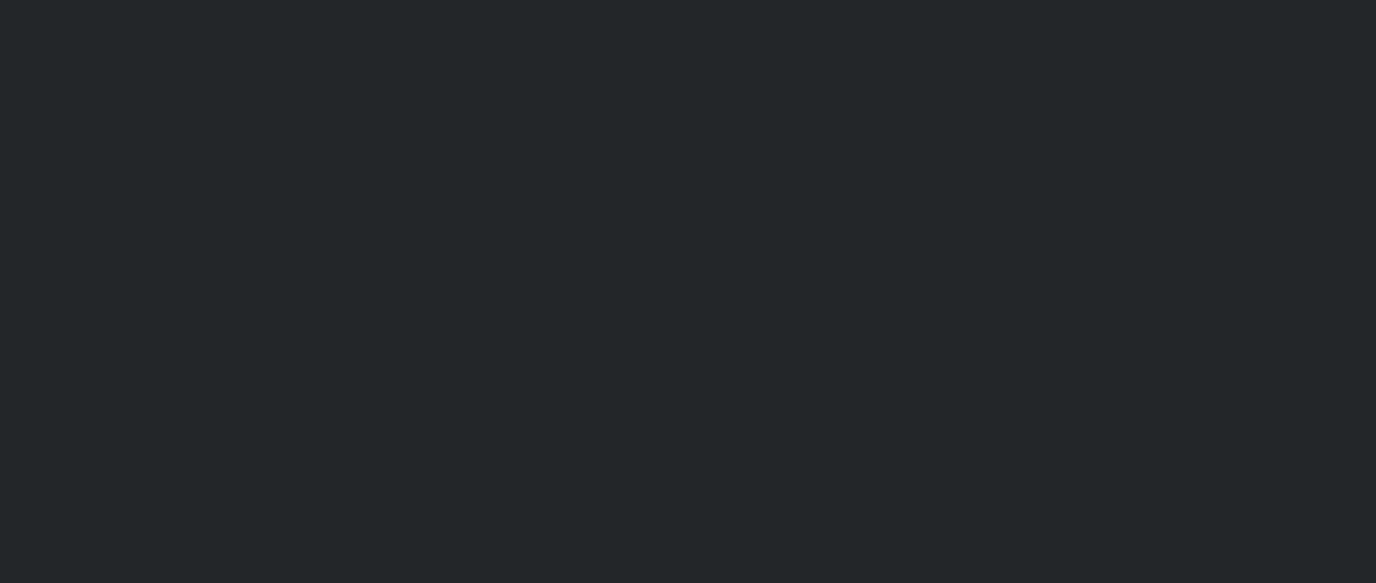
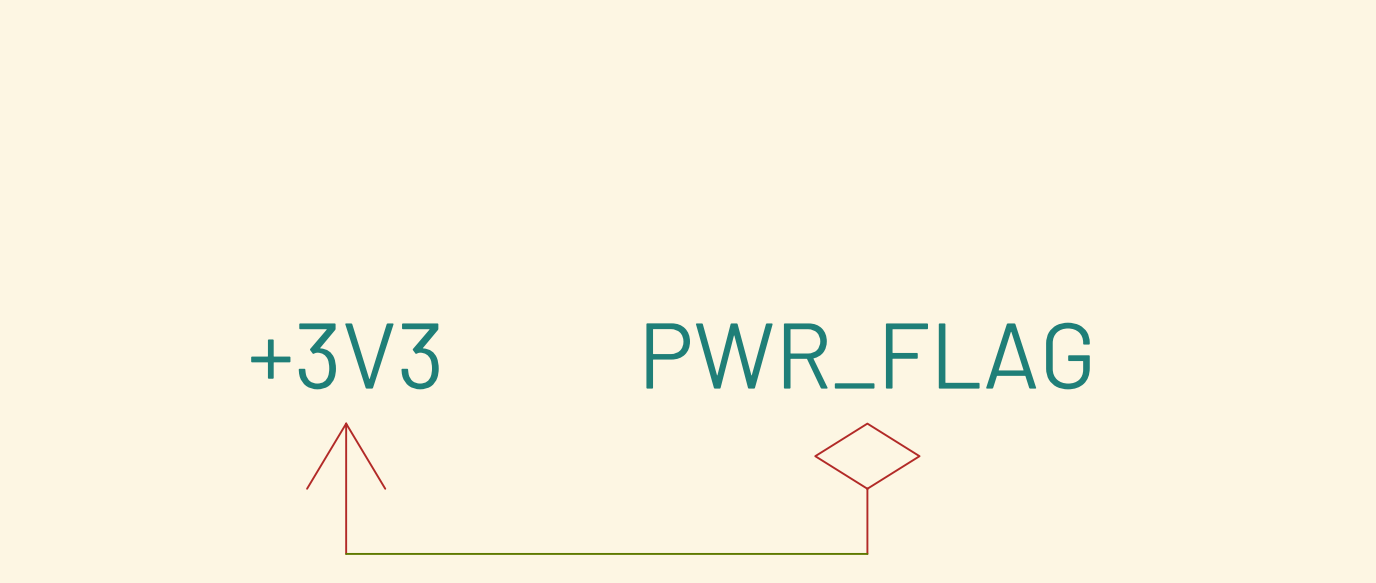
power symbol: none -> +3V3 (346, 488)
power symbol: none -> PWR_FLAG (867, 488)
wire: none -> (346, 553) (867, 553)

